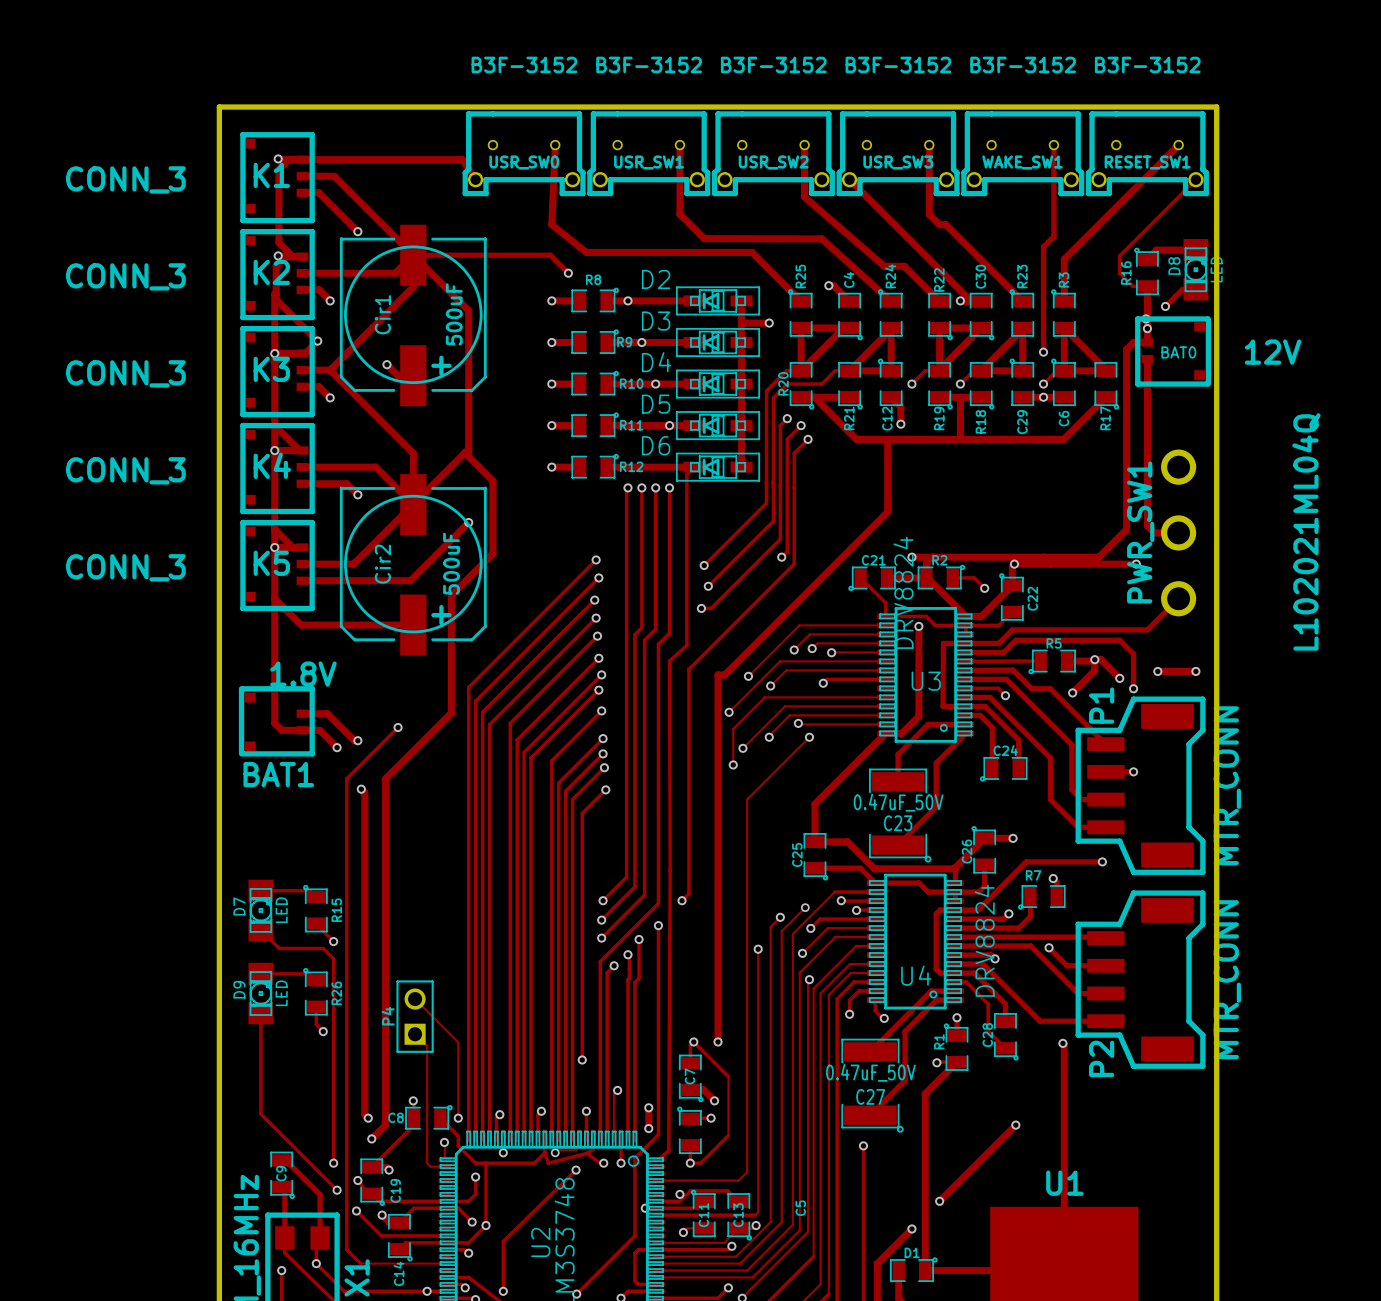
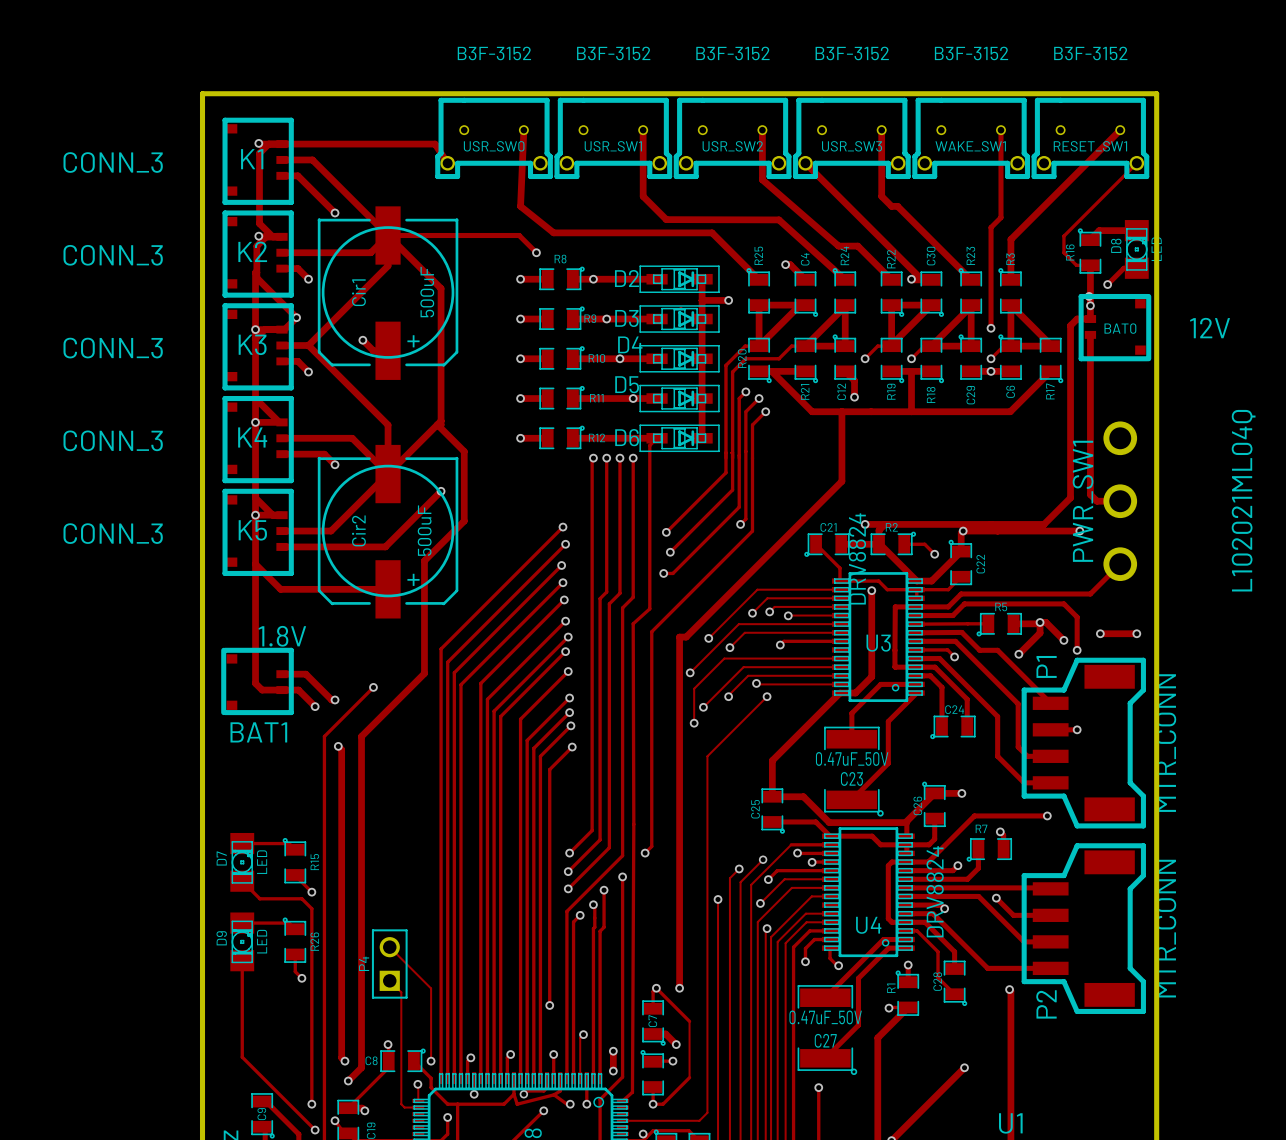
D2 rotation: 0° (718, 300) -> 180° (679, 279)
D3 rotation: 0° (718, 342) -> 180° (679, 319)
D4 rotation: 0° (718, 384) -> 180° (679, 358)
D5 rotation: 0° (718, 425) -> 180° (679, 398)
D6 rotation: 0° (718, 467) -> 180° (679, 438)

